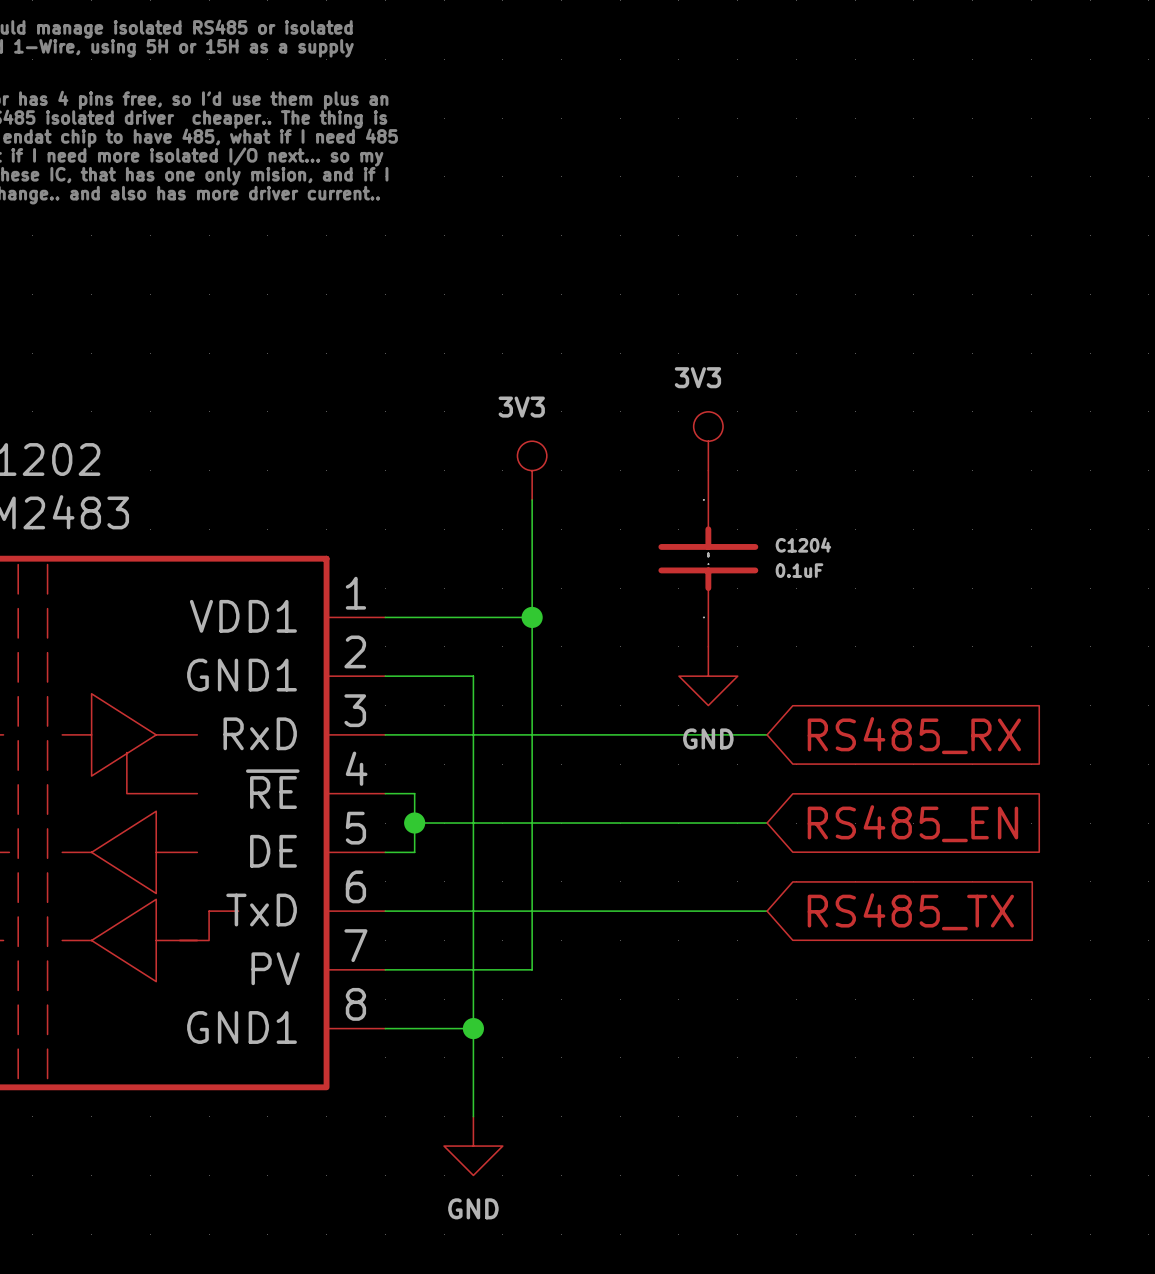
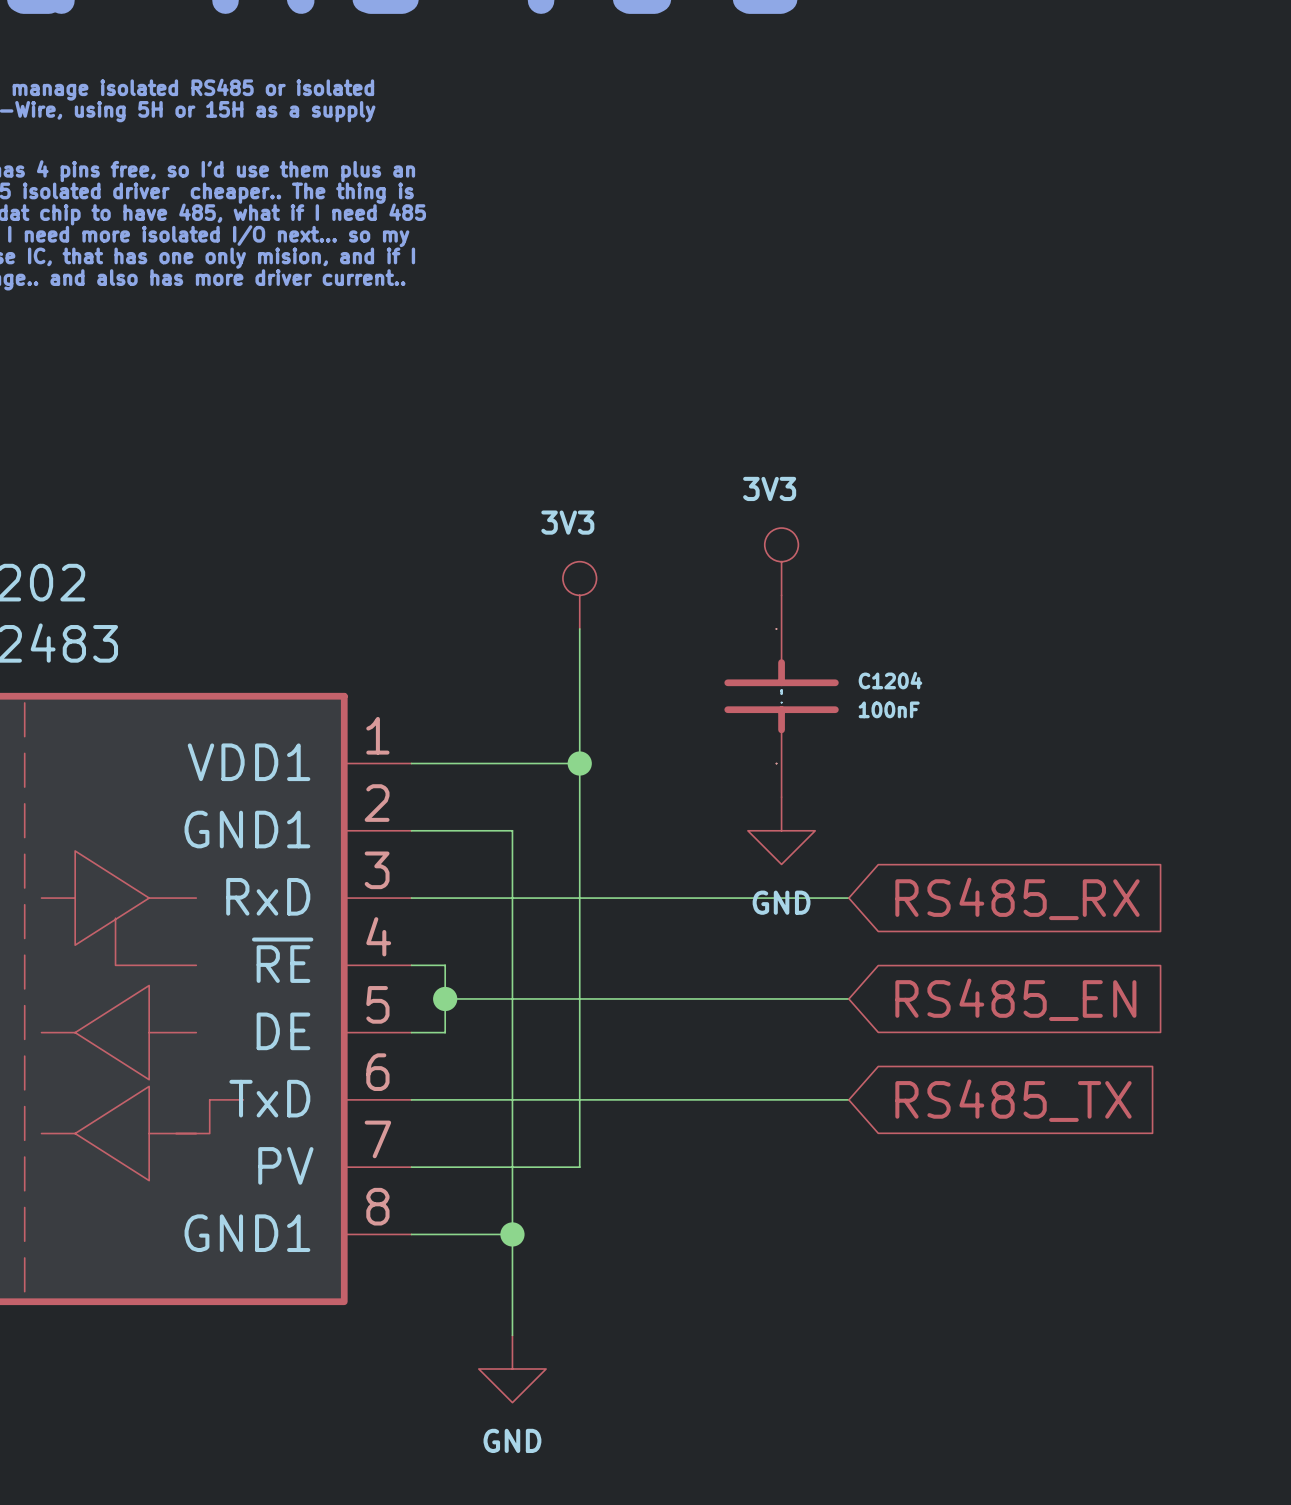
C1204 value: 0.1uF (799, 570) -> 100nF (889, 709)

